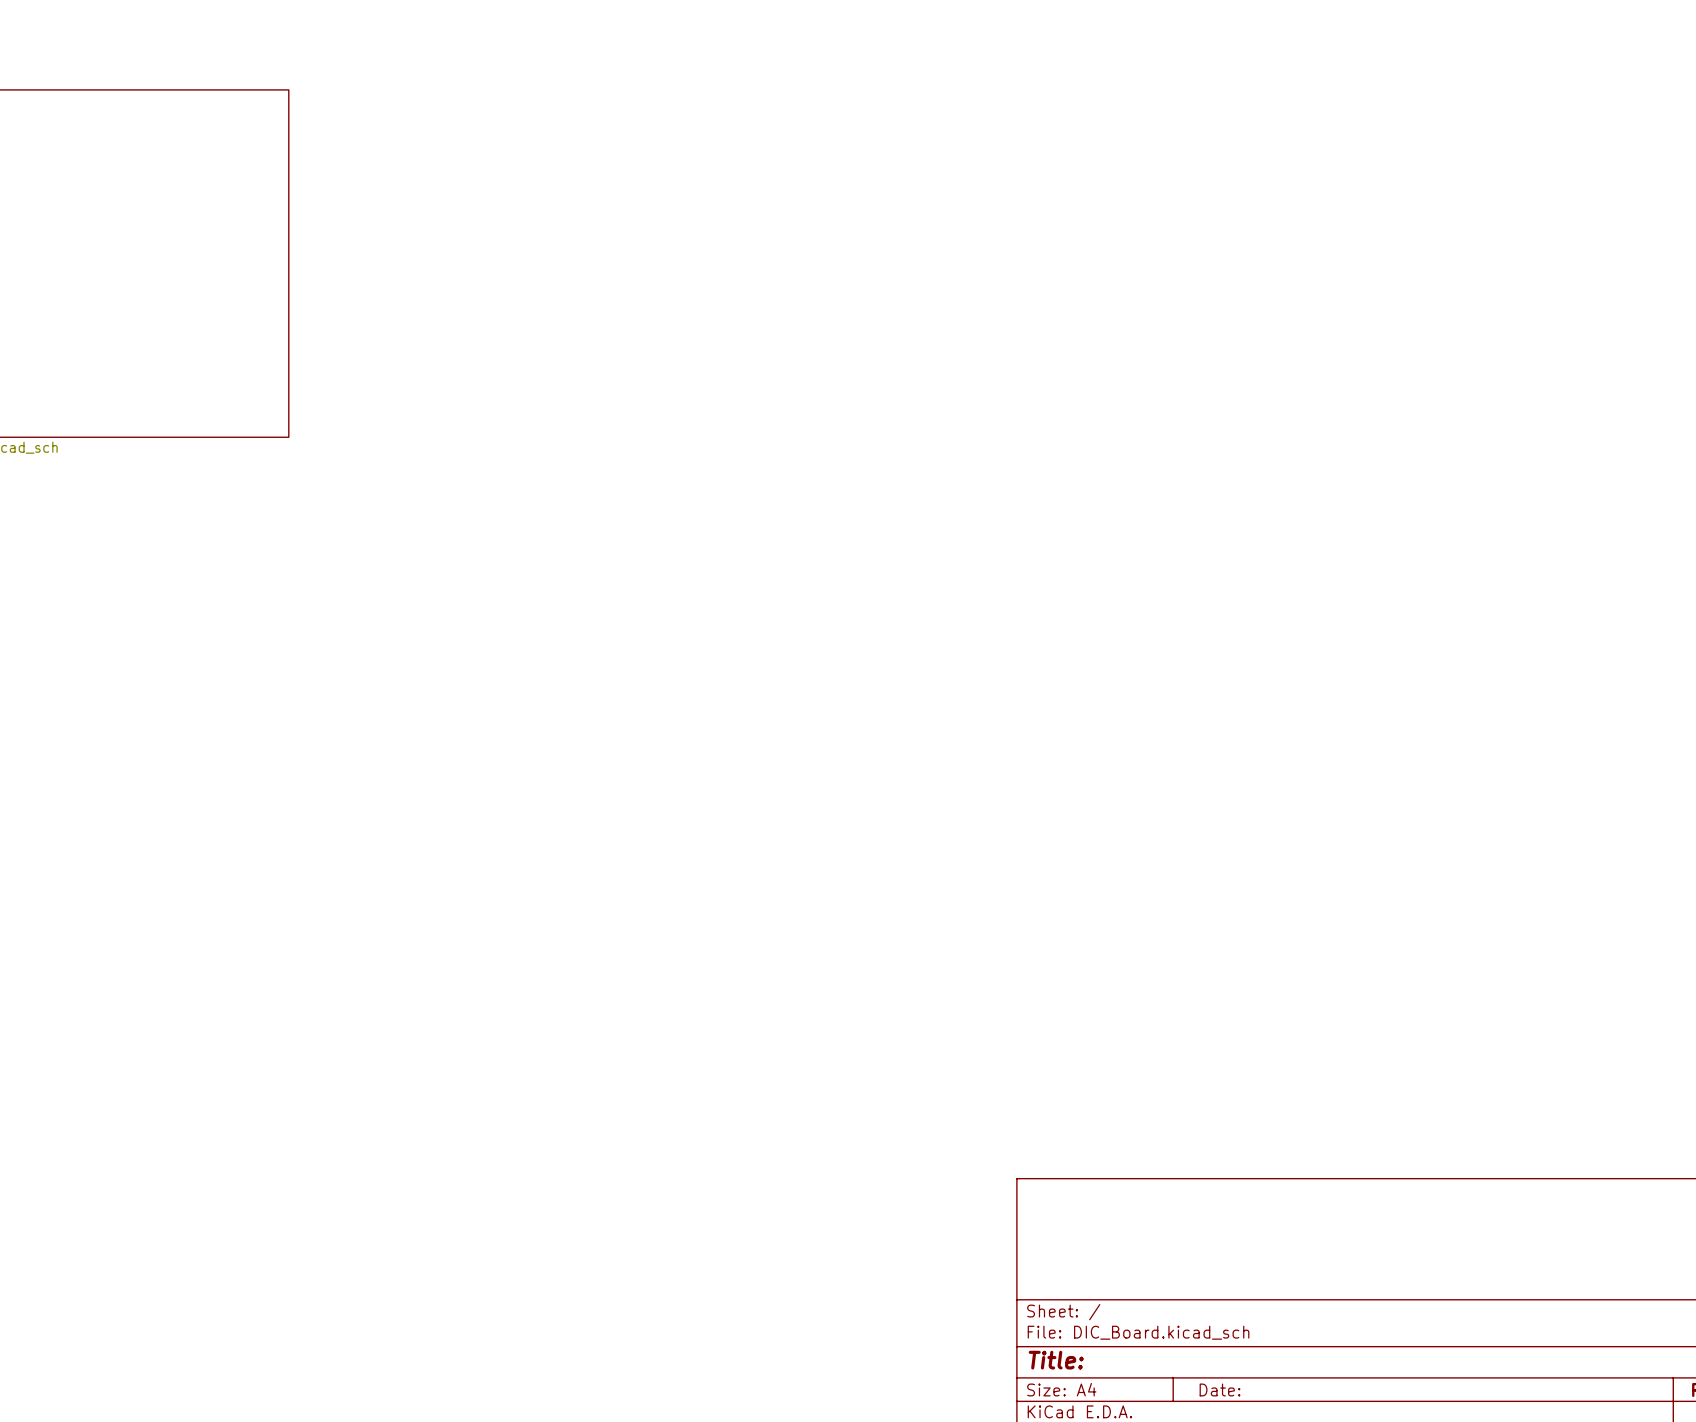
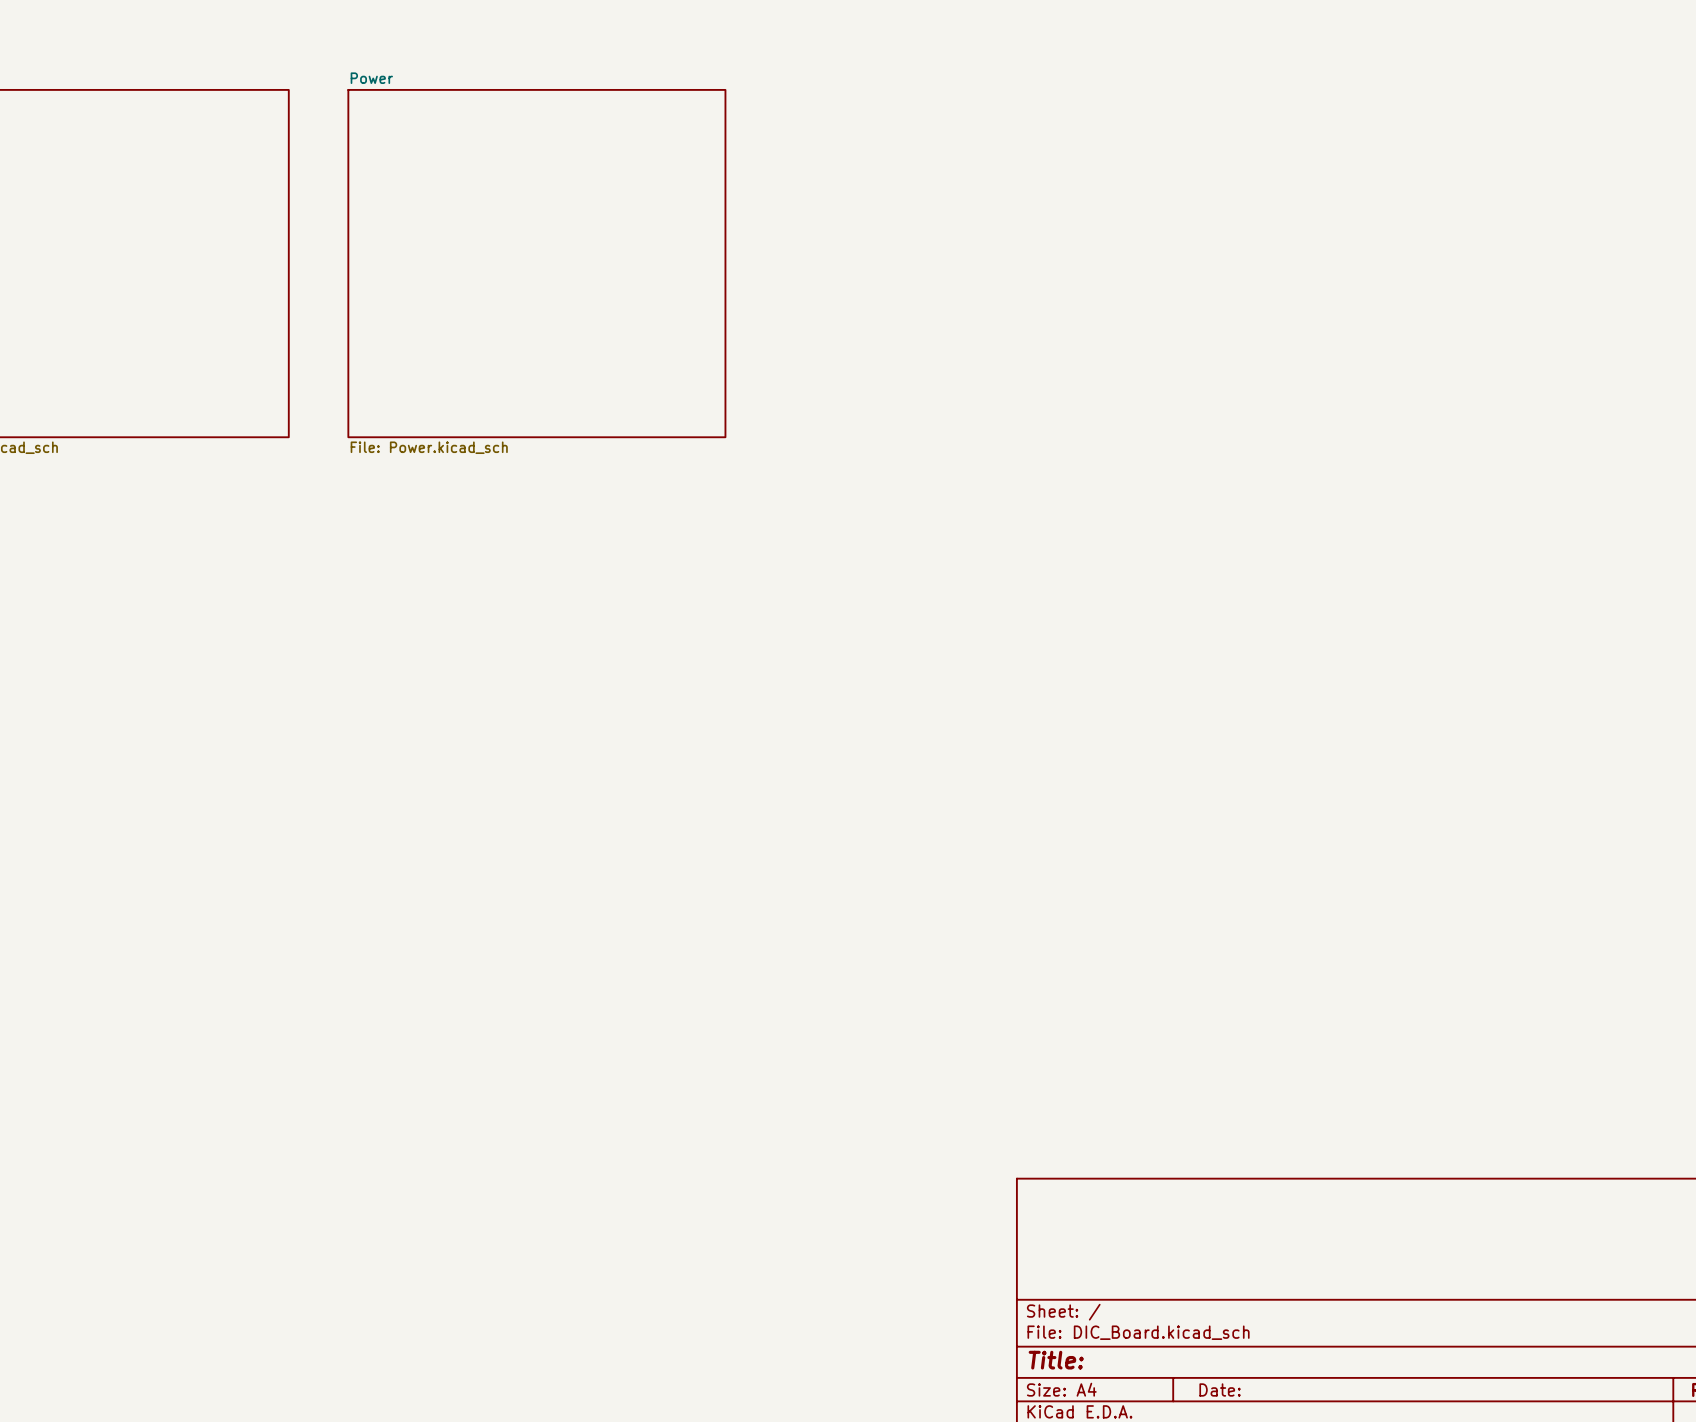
sheet Power: none -> File: Power.kicad_sch (536, 263)

